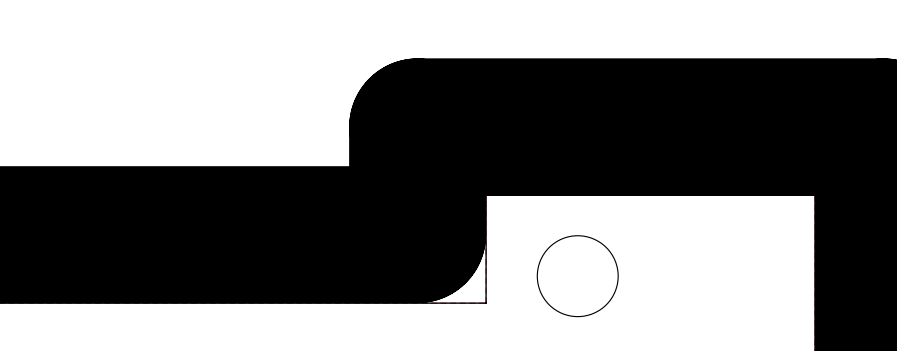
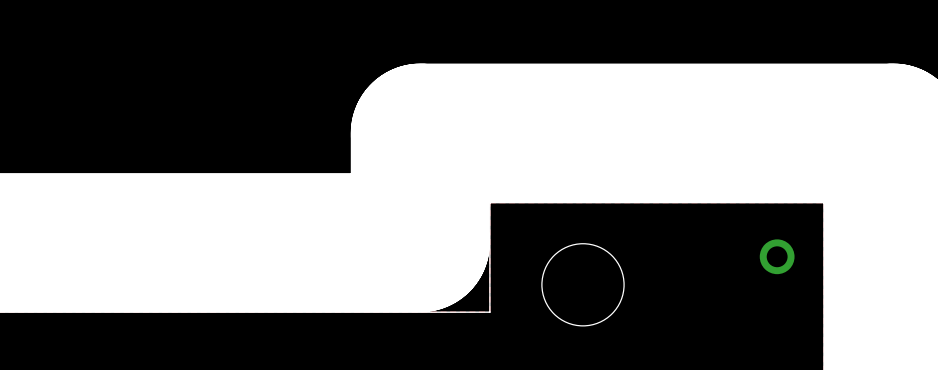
via: none -> (777, 256)

